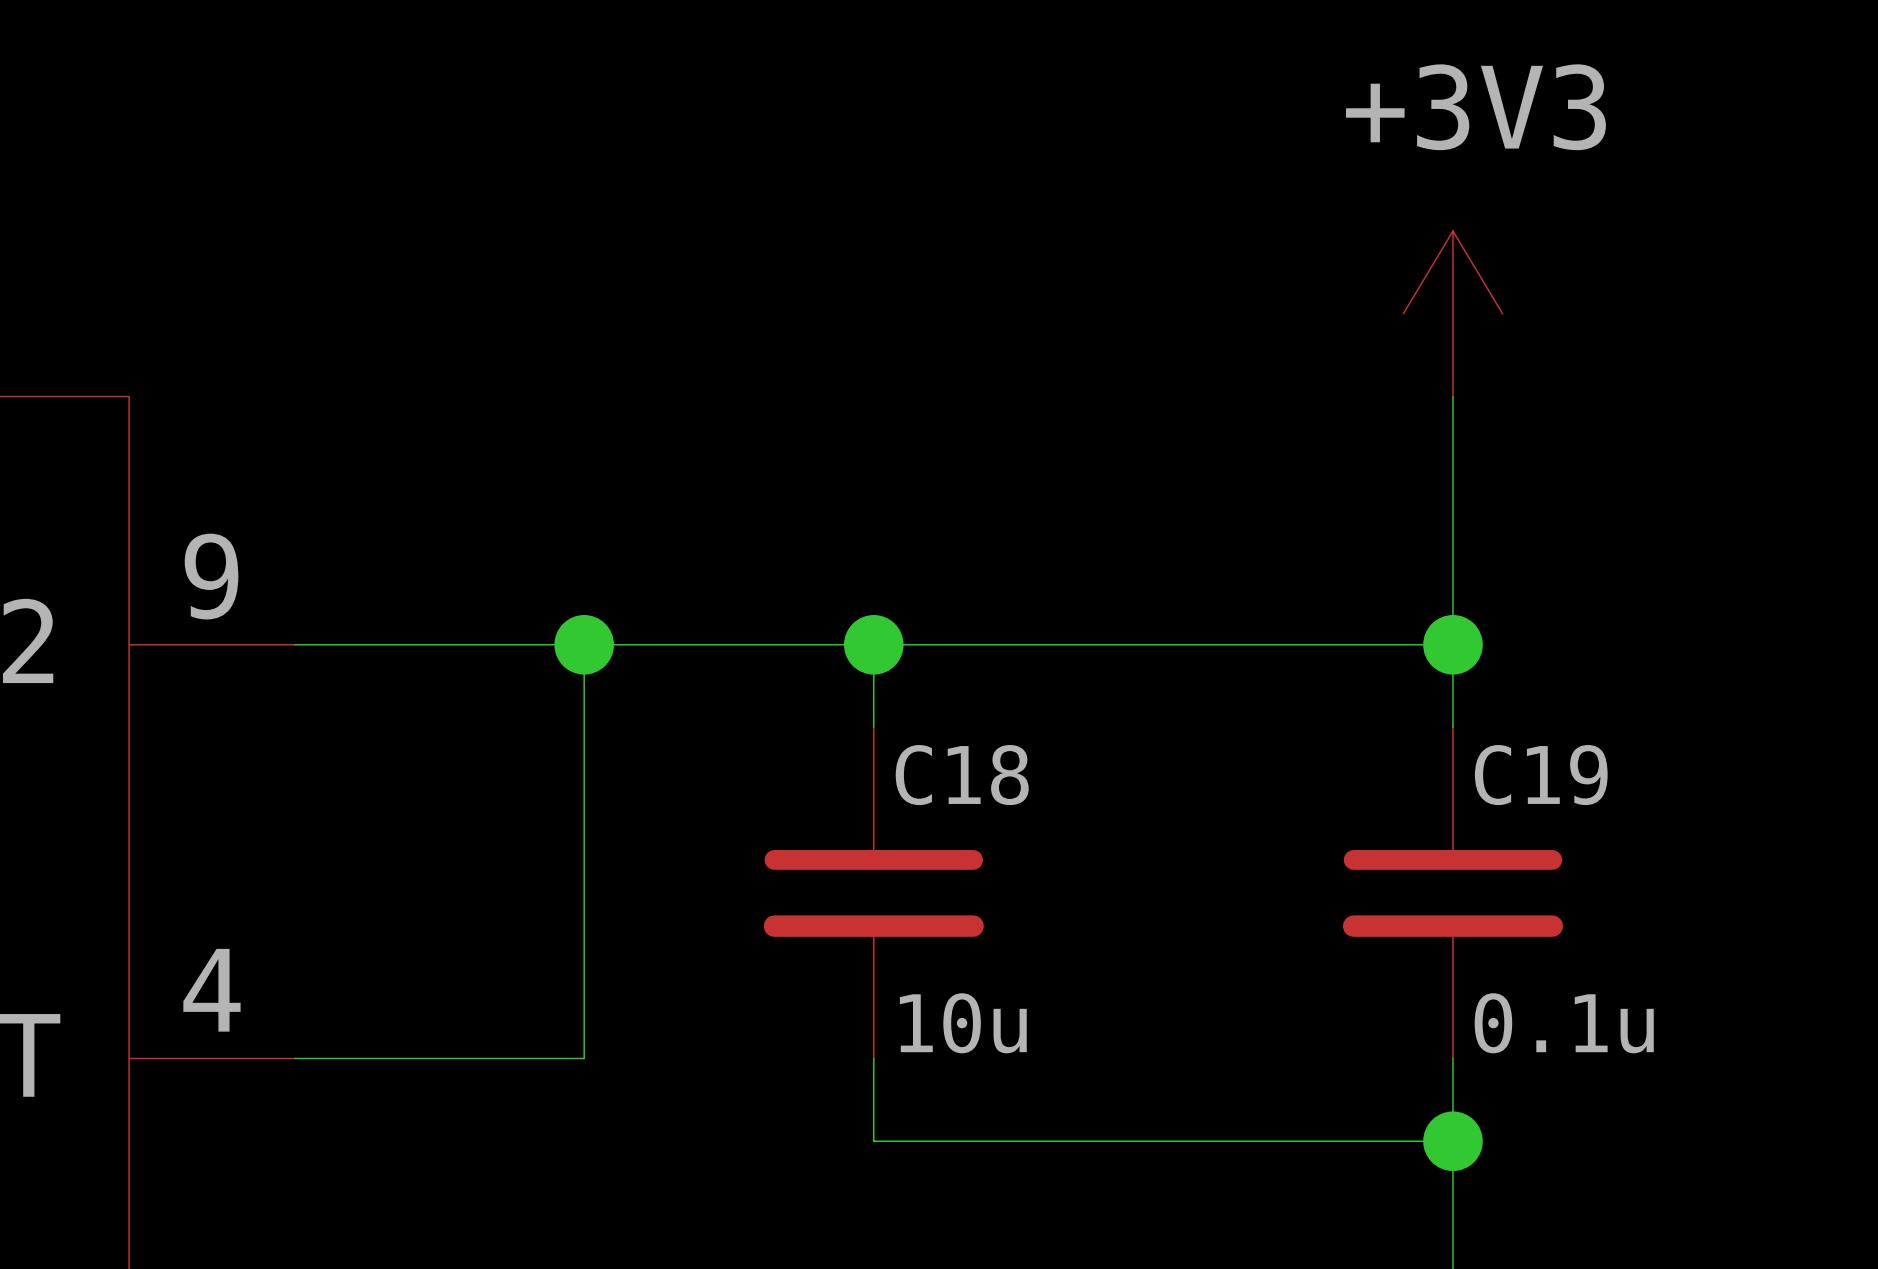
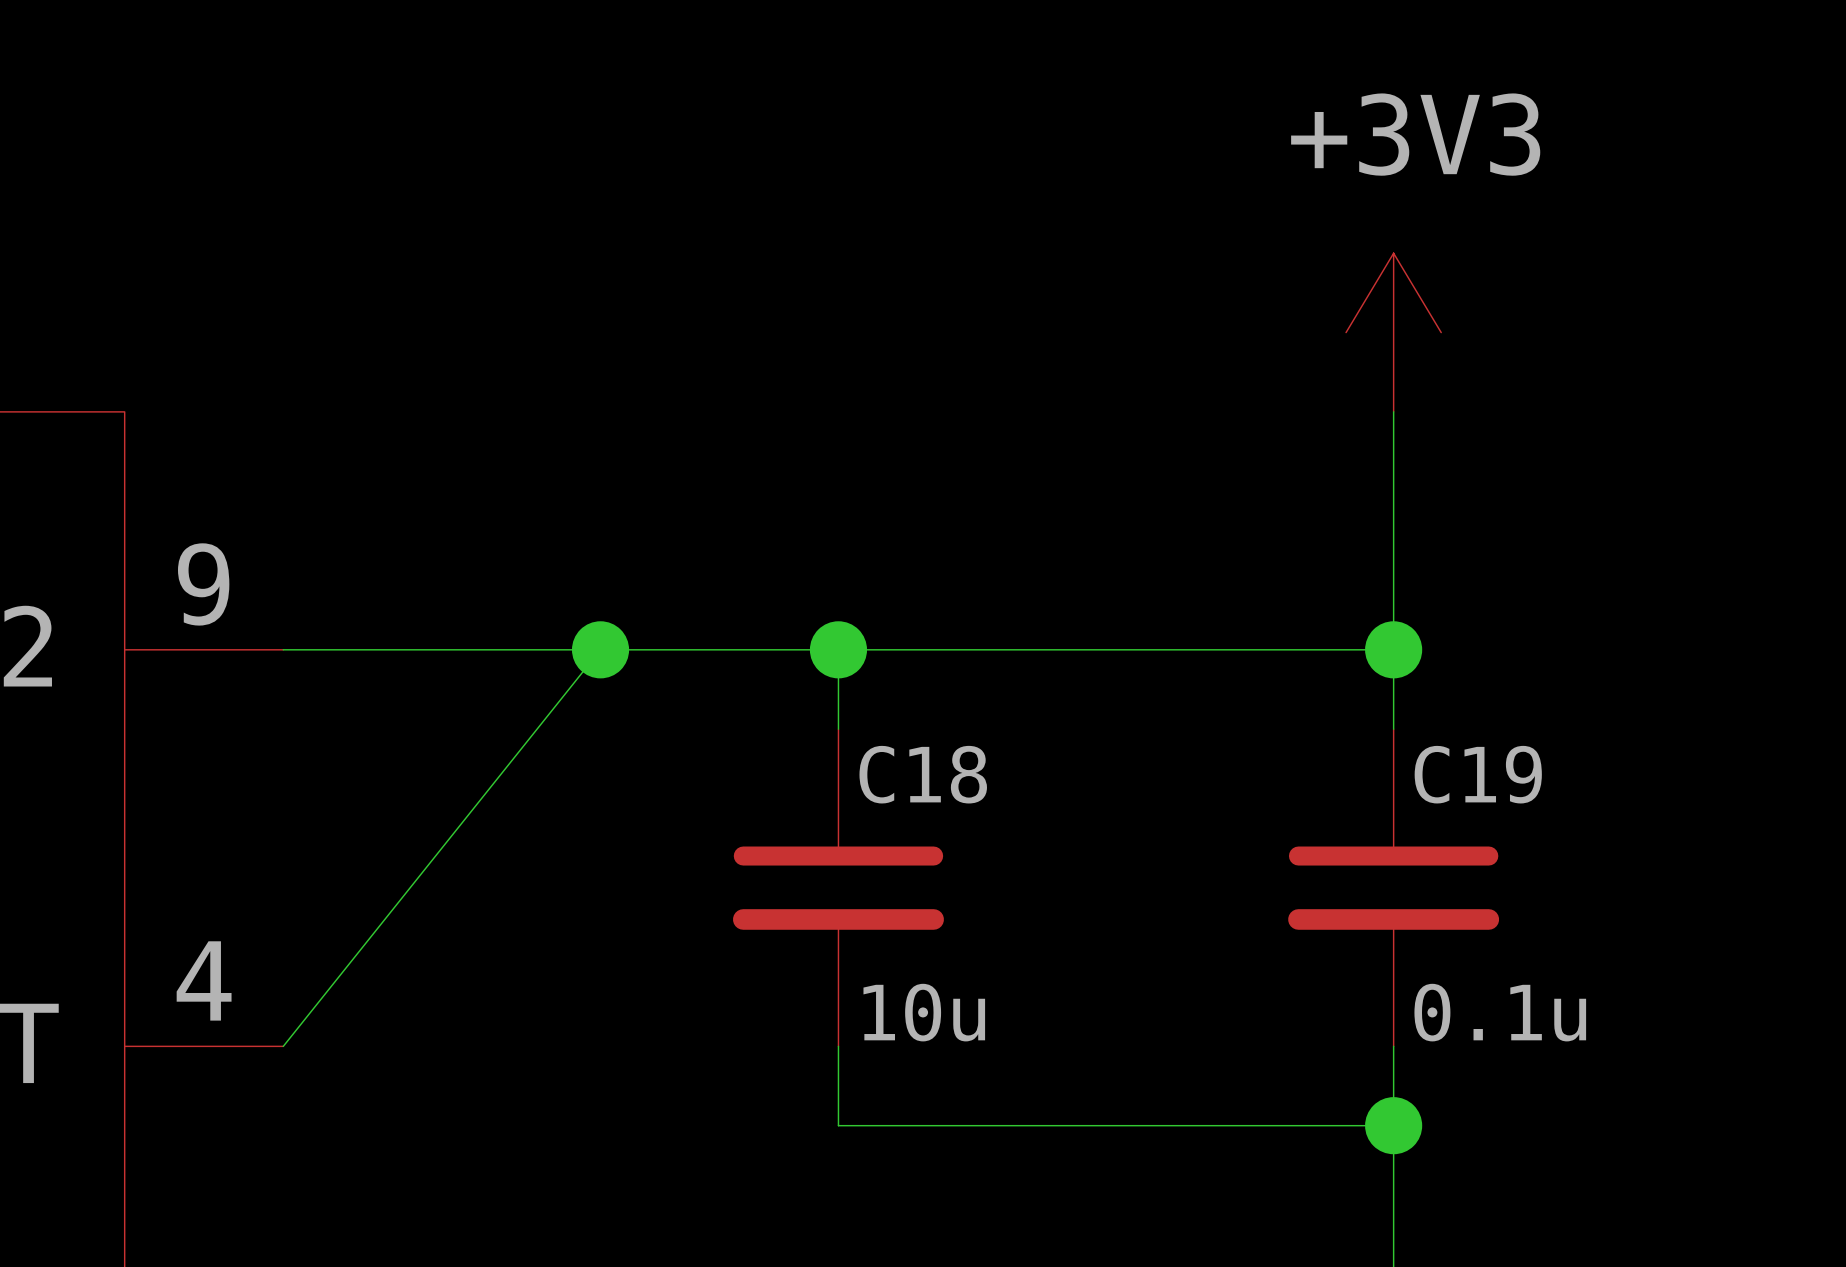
wire: (584, 644) (584, 1058) (294, 1058) -> (600, 649) (283, 1046)
junction position: (584, 644) -> (600, 649)

